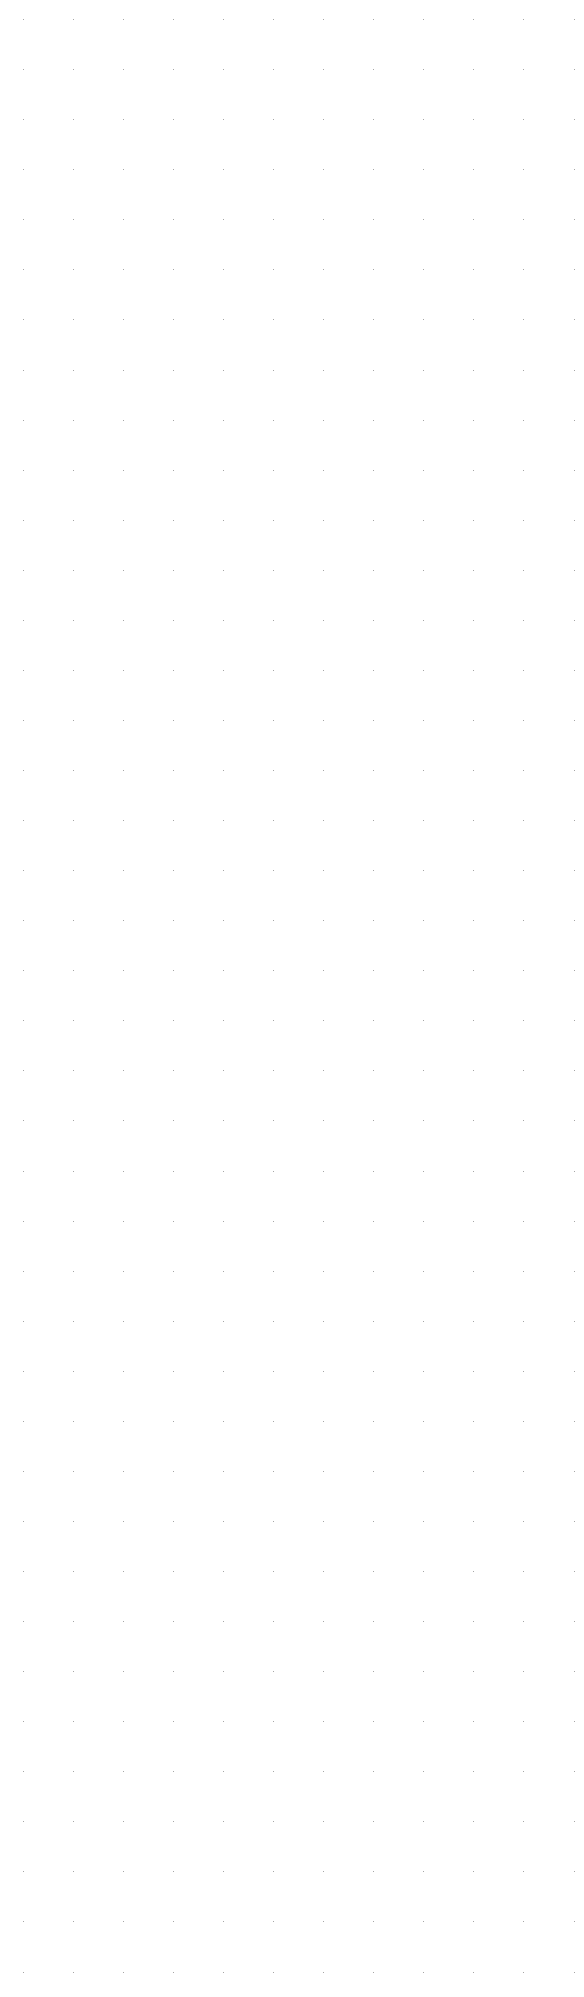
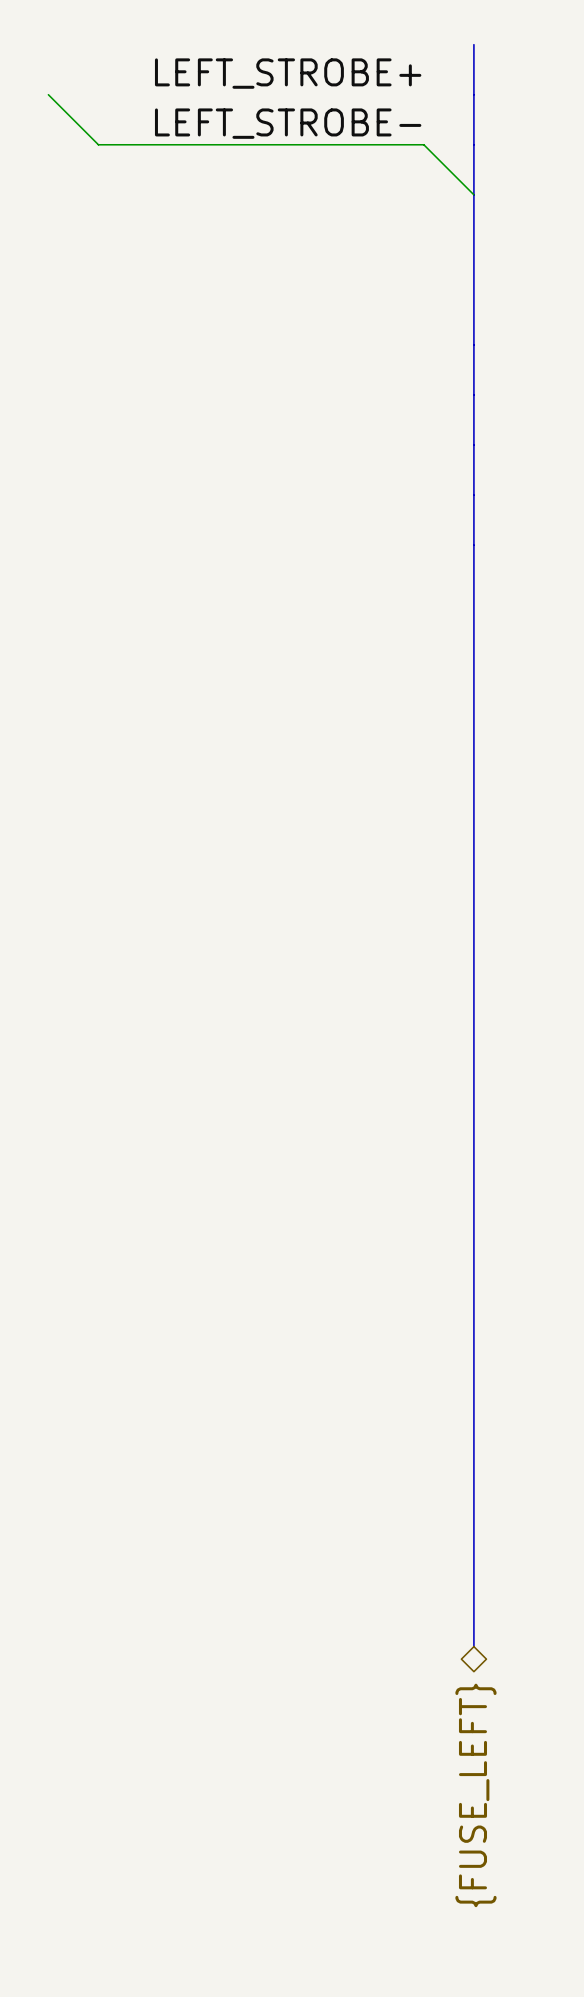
bus: none -> (473, 44) (473, 1646)
label: none -> LEFT_STROBE+ (288, 73)
wire: none -> (48, 94) (98, 144) (423, 144) (473, 194)
label: none -> LEFT_STROBE- (288, 123)
hierarchical label: none -> {FUSE_LEFT} (475, 1795)

